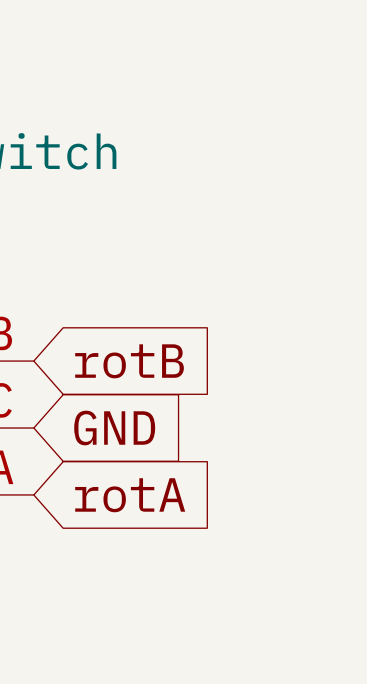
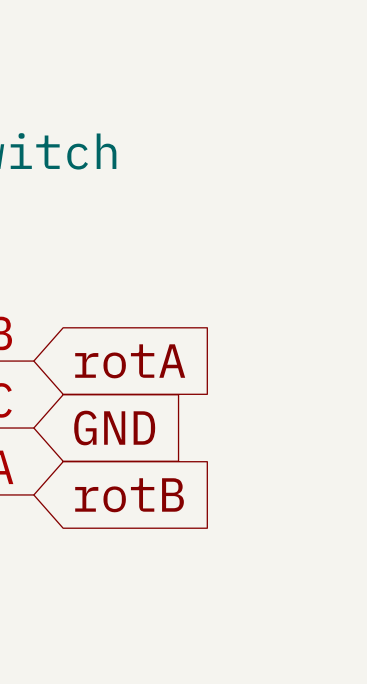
global label: rotB (129, 361) -> rotA (130, 361)
global label: rotA (130, 495) -> rotB (129, 495)

